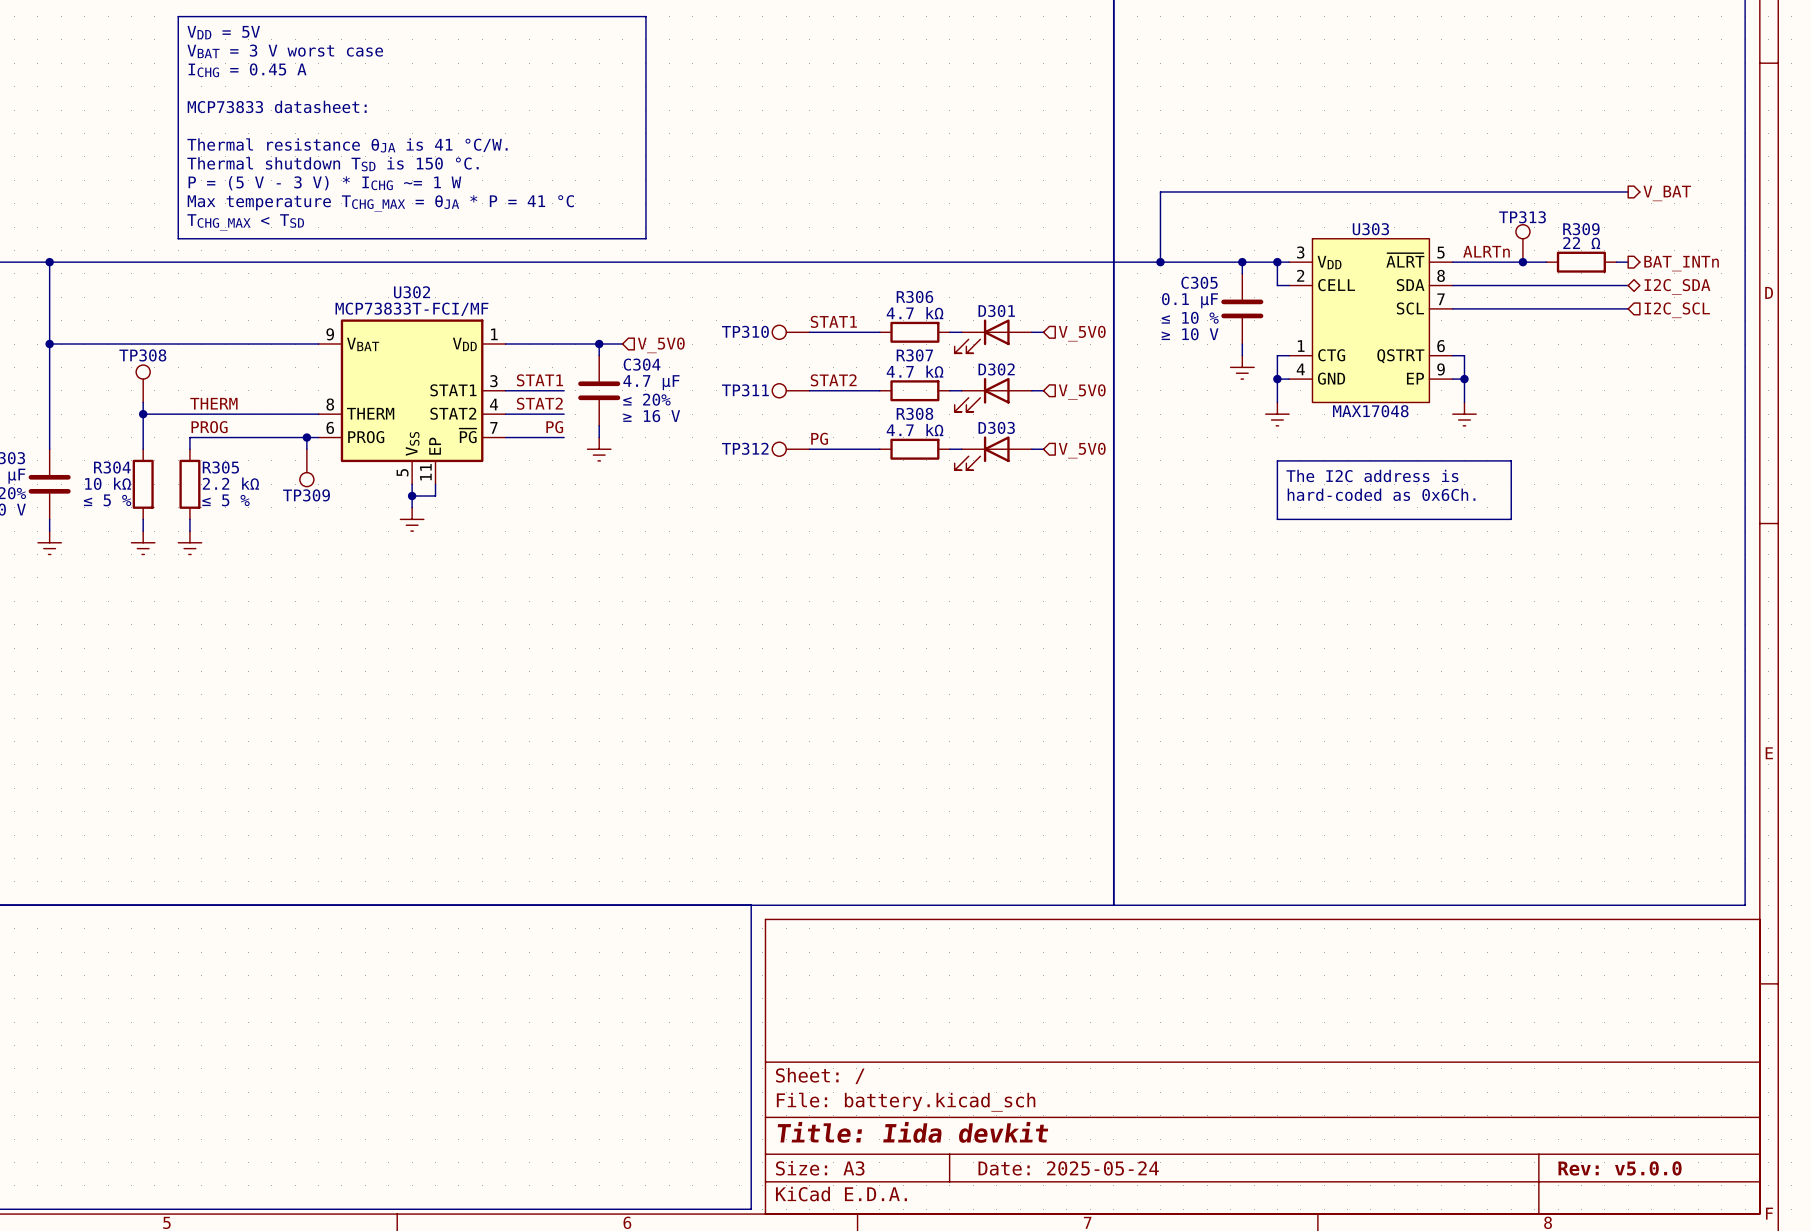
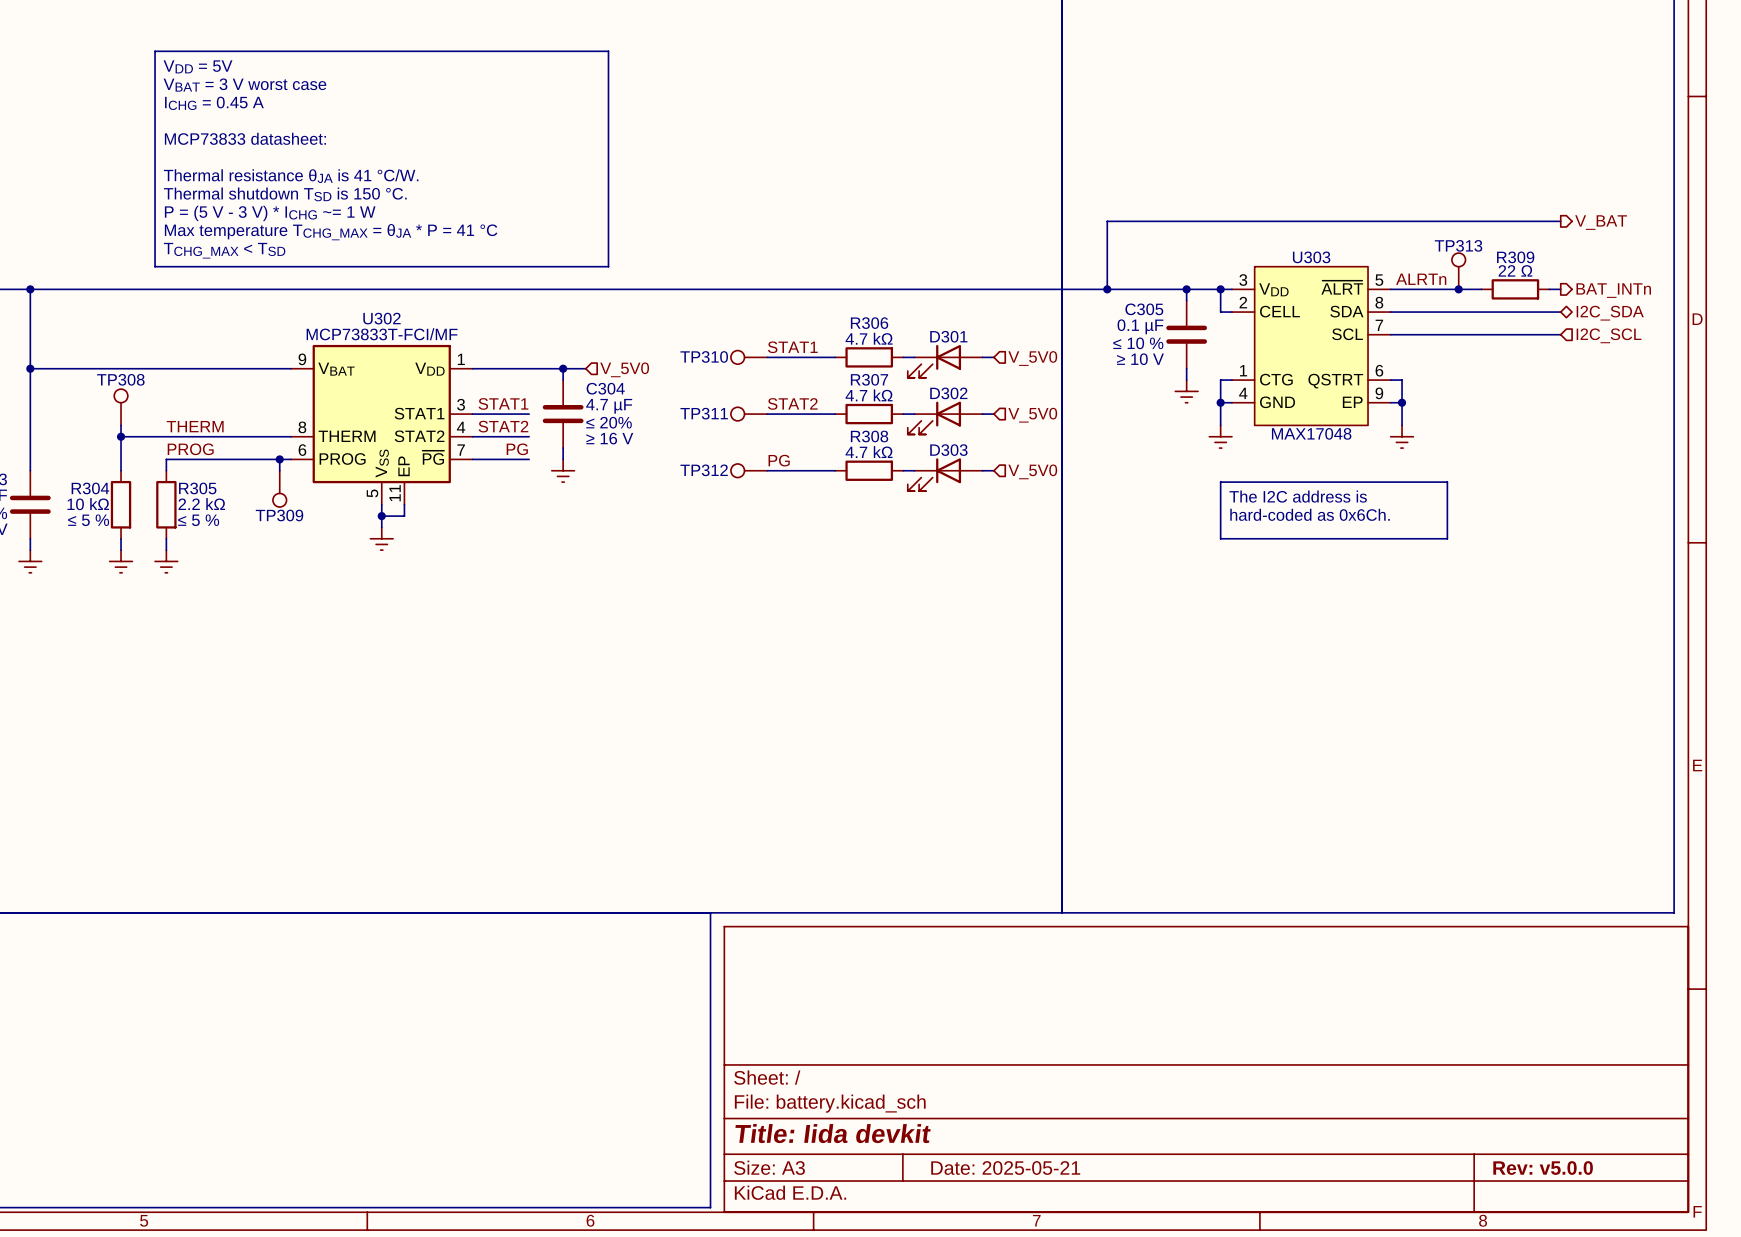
title block: Date: 2025-05-24 (1068, 1168) -> Date: 2025-05-21 (1005, 1168)

